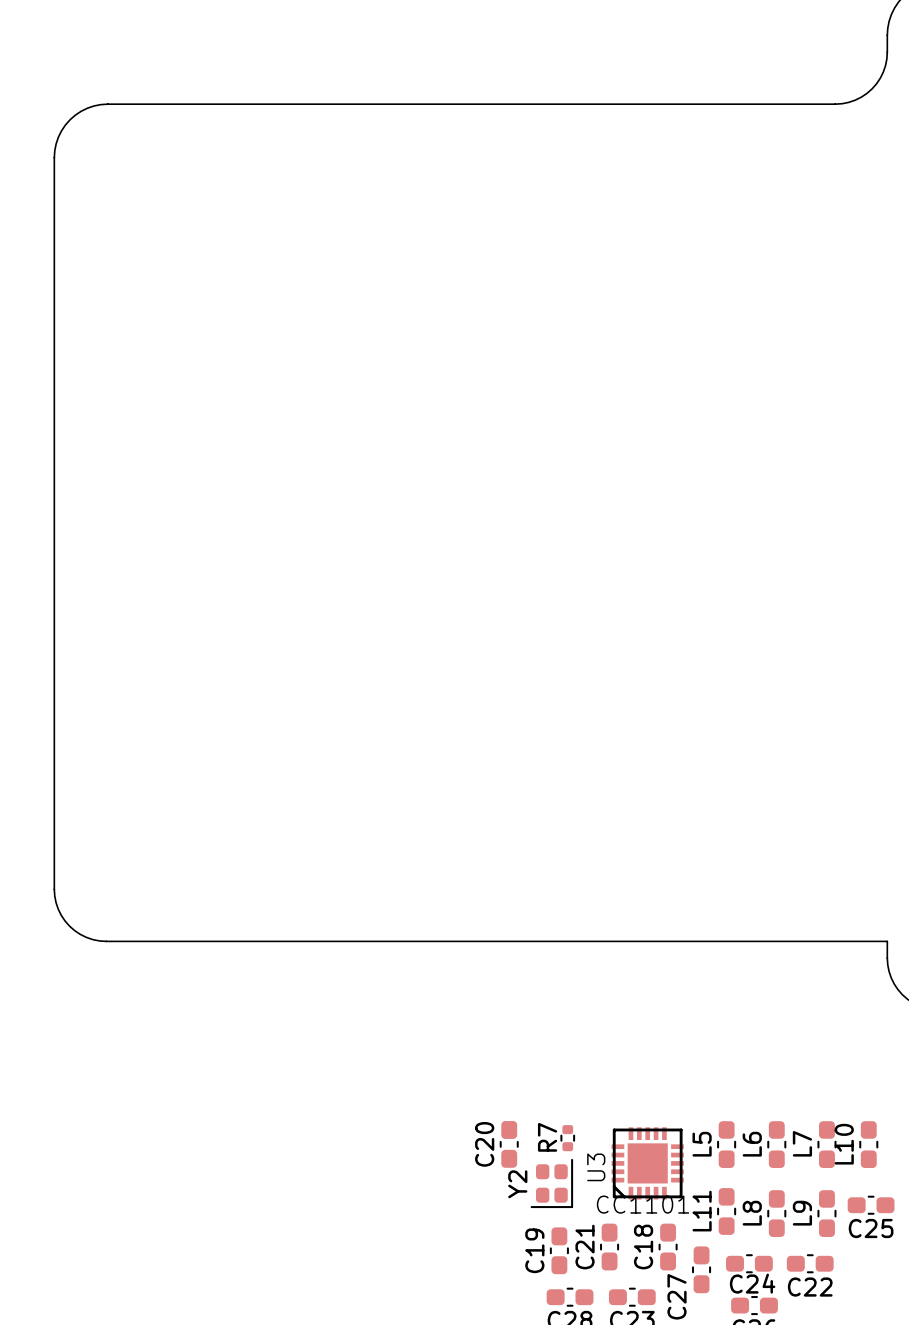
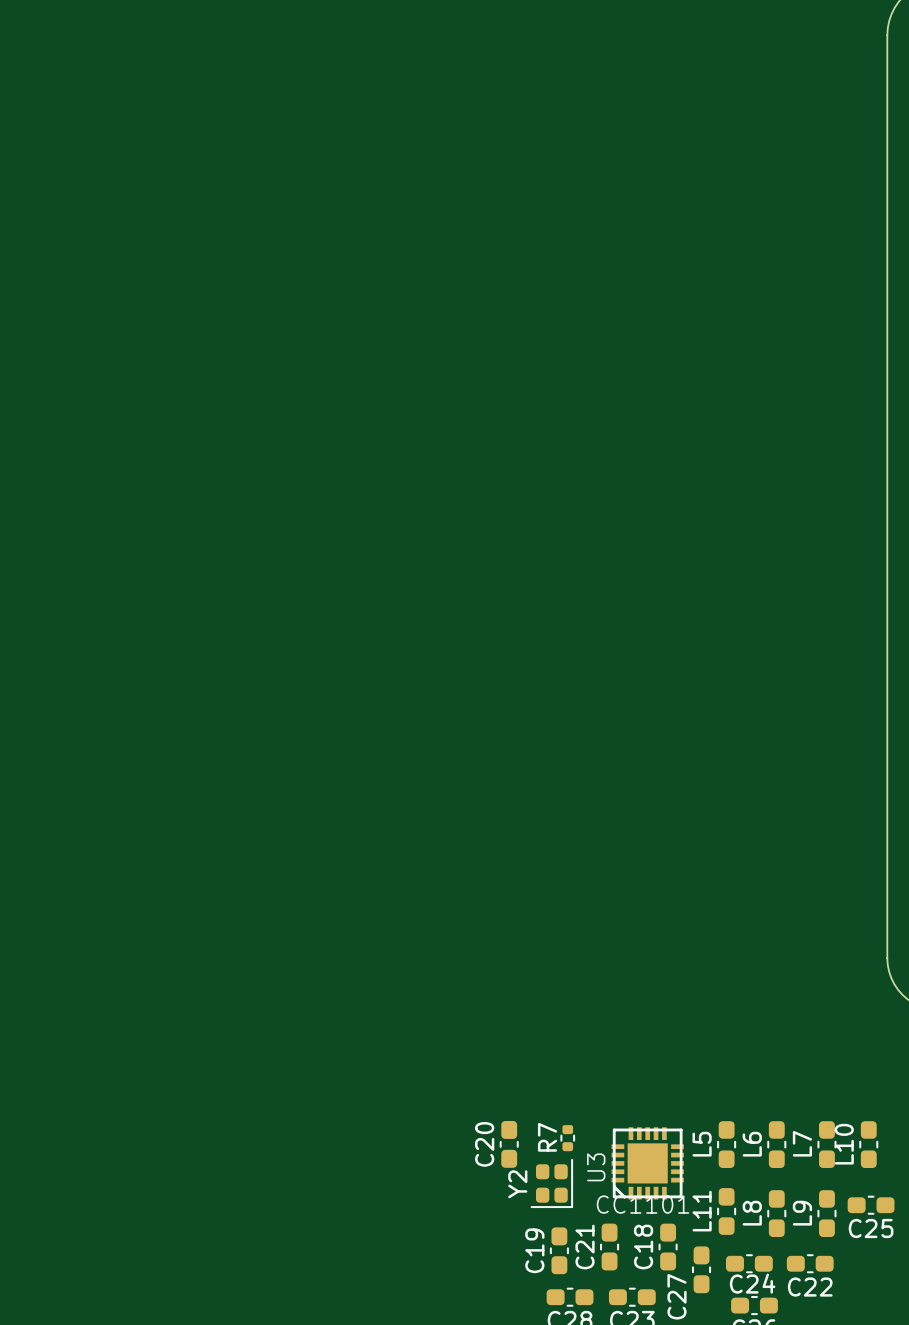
board edge: (887, 52) (883, 72) (872, 88) (861, 97) (842, 103) (100, 104) (81, 111) (70, 119) (58, 137) (54, 157) (54, 889) (58, 909) (69, 926) (86, 937) (106, 941) (887, 941) -> (887, 52) (887, 941)

